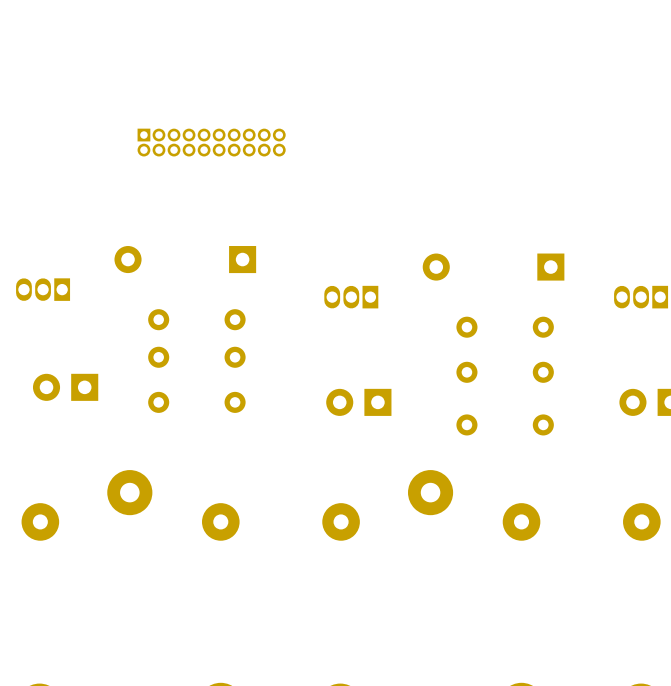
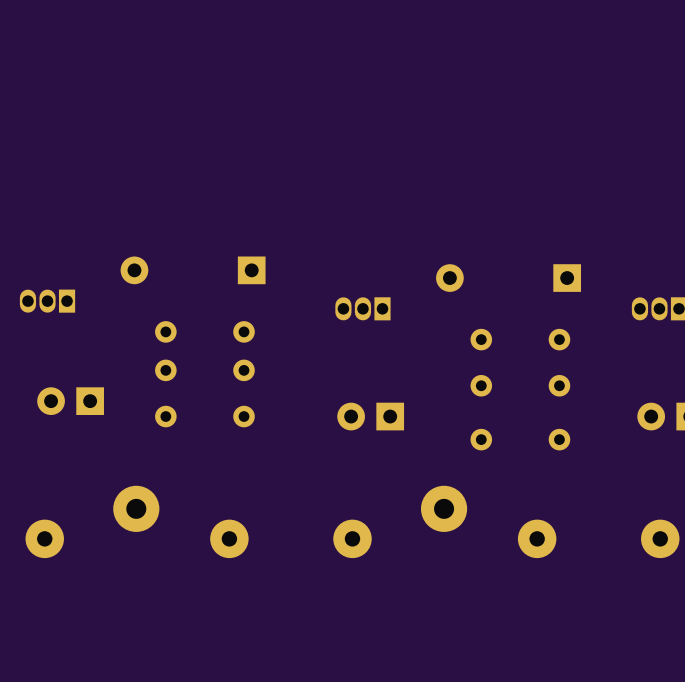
part: (211, 142) -> none

